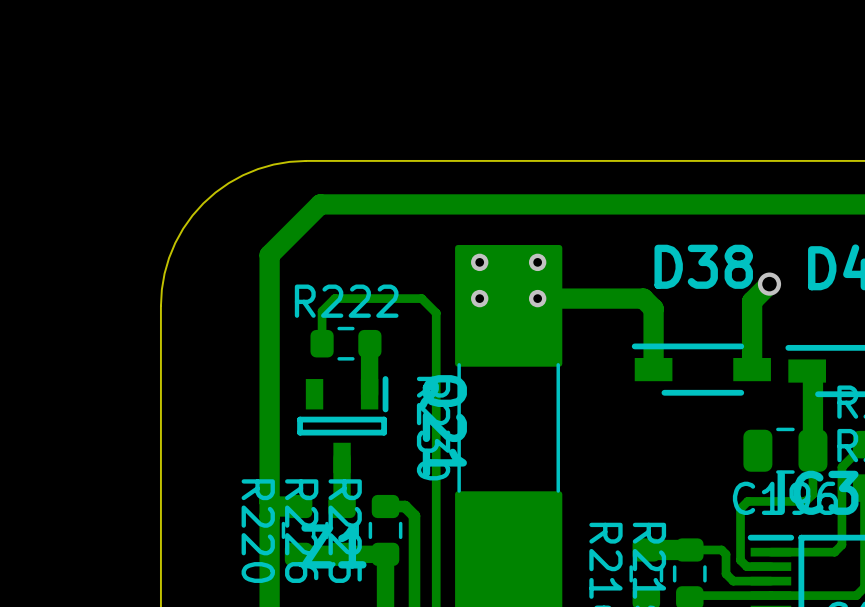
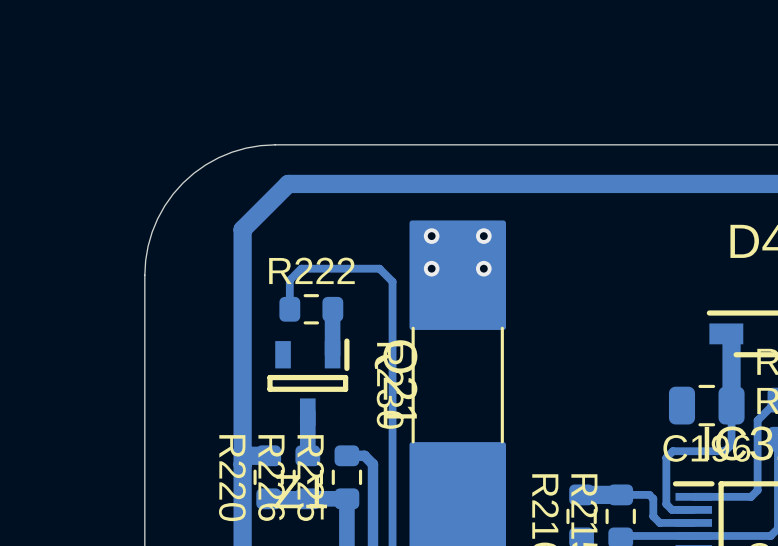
track: (769, 284) (752, 301) (752, 369) -> none
via: (769, 284) -> none
track: (537, 298) (643, 298) (653, 308) (653, 369) -> none
D38: (701, 369) -> none

